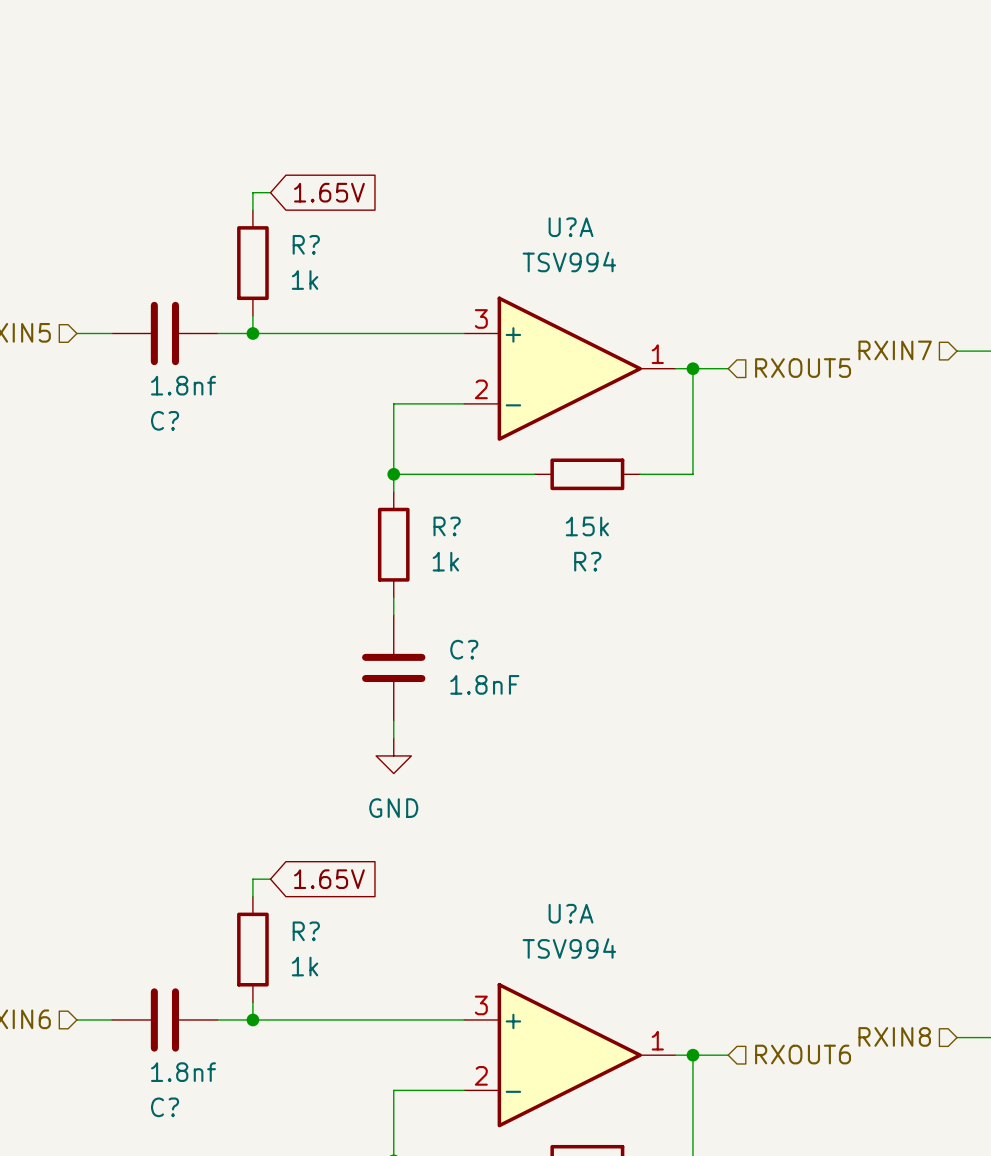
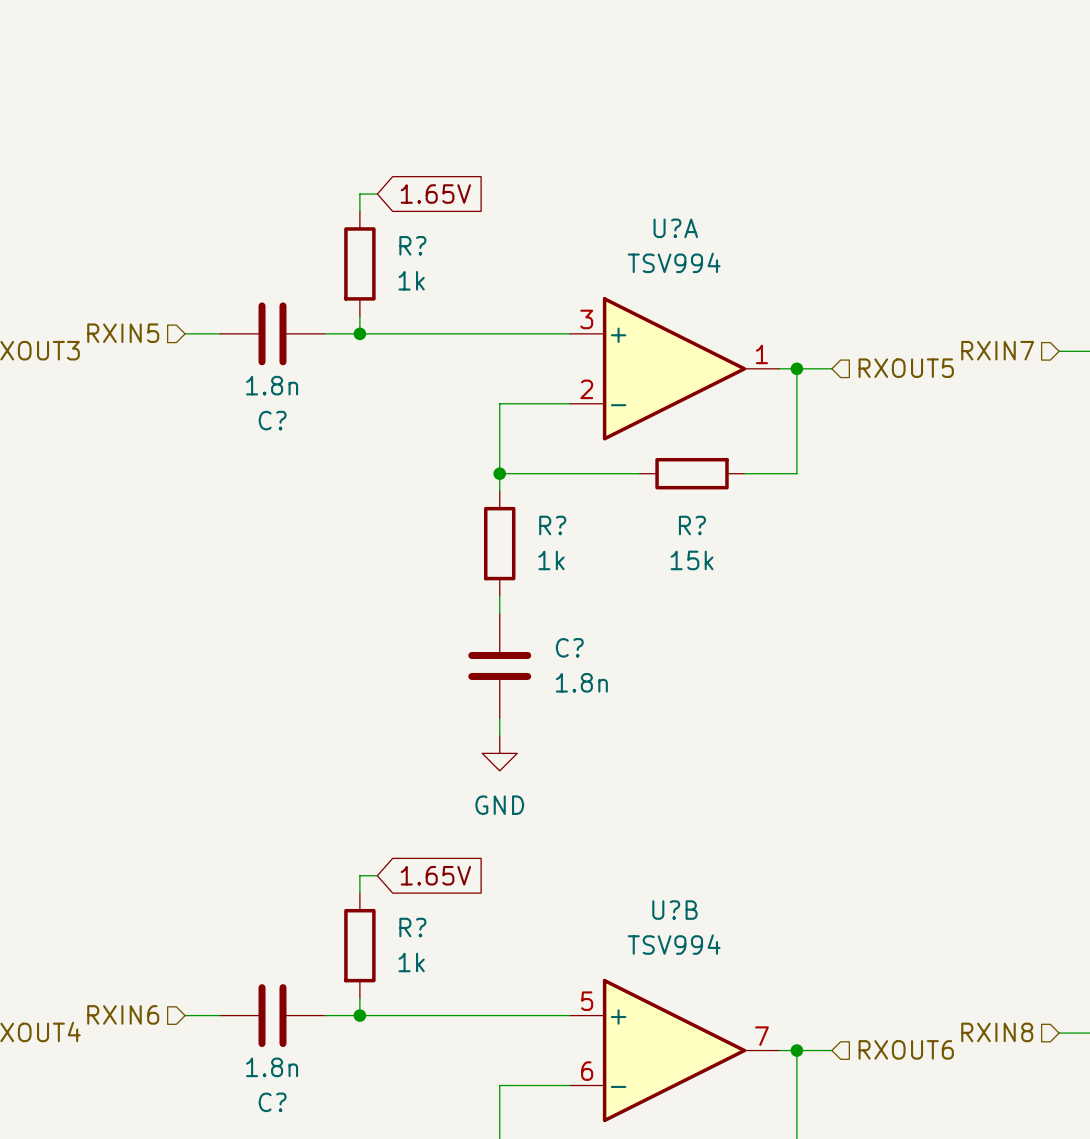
C? value: 1.8nf (183, 385) -> 1.8n (272, 385)
R? value position: 15k (587, 526) -> 15k (692, 560)
R? name position: R? (587, 561) -> R? (692, 525)
C? value: 1.8nF (484, 684) -> 1.8n (581, 682)
U?A name: U?A (571, 913) -> U?B (674, 910)
U?A pin number: 3 (481, 1005) -> 5 (587, 1001)
U?A pin number: 1 (657, 1040) -> 7 (761, 1036)
C? value: 1.8nf (183, 1072) -> 1.8n (272, 1067)
U?A pin number: 2 (481, 1075) -> 6 (587, 1071)

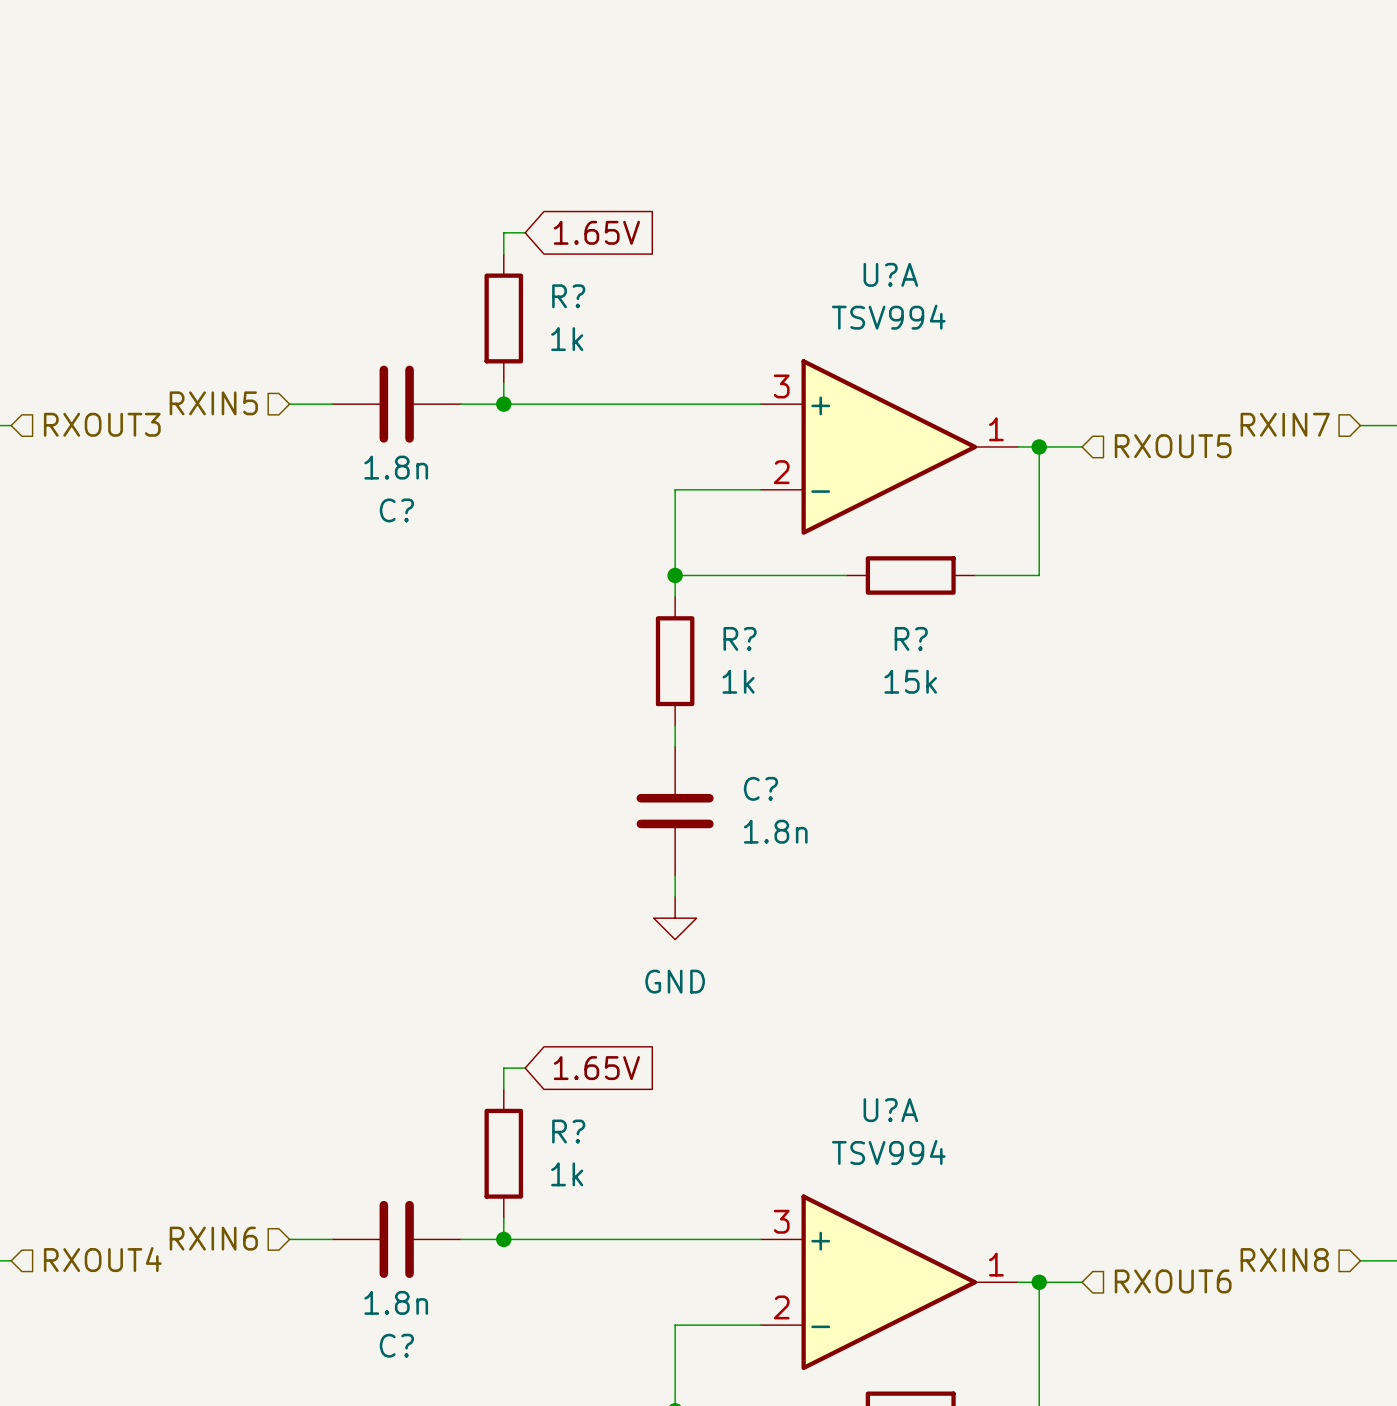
U?B name: U?B (674, 910) -> U?A (890, 1110)
U?B pin number: 5 (587, 1001) -> 3 (781, 1221)
U?B pin number: 7 (761, 1036) -> 1 (996, 1264)
U?B pin number: 6 (587, 1071) -> 2 (781, 1307)

